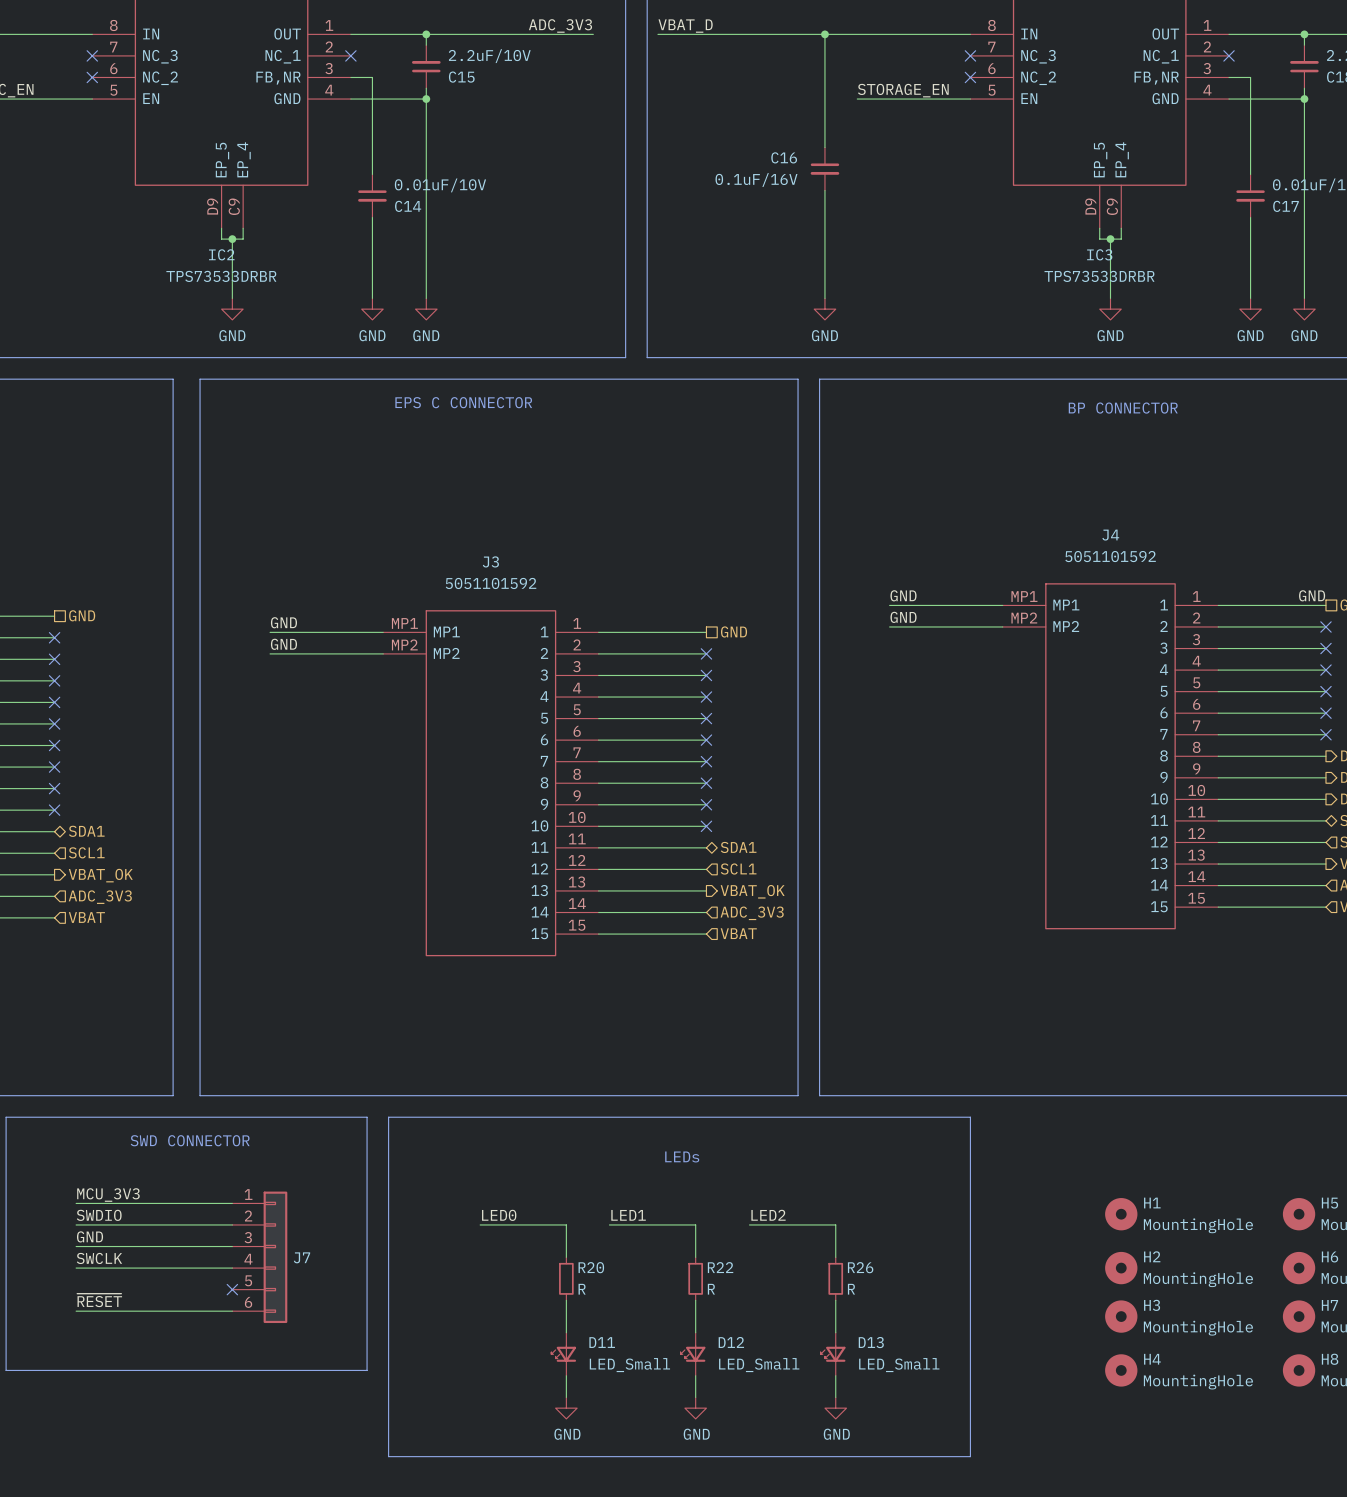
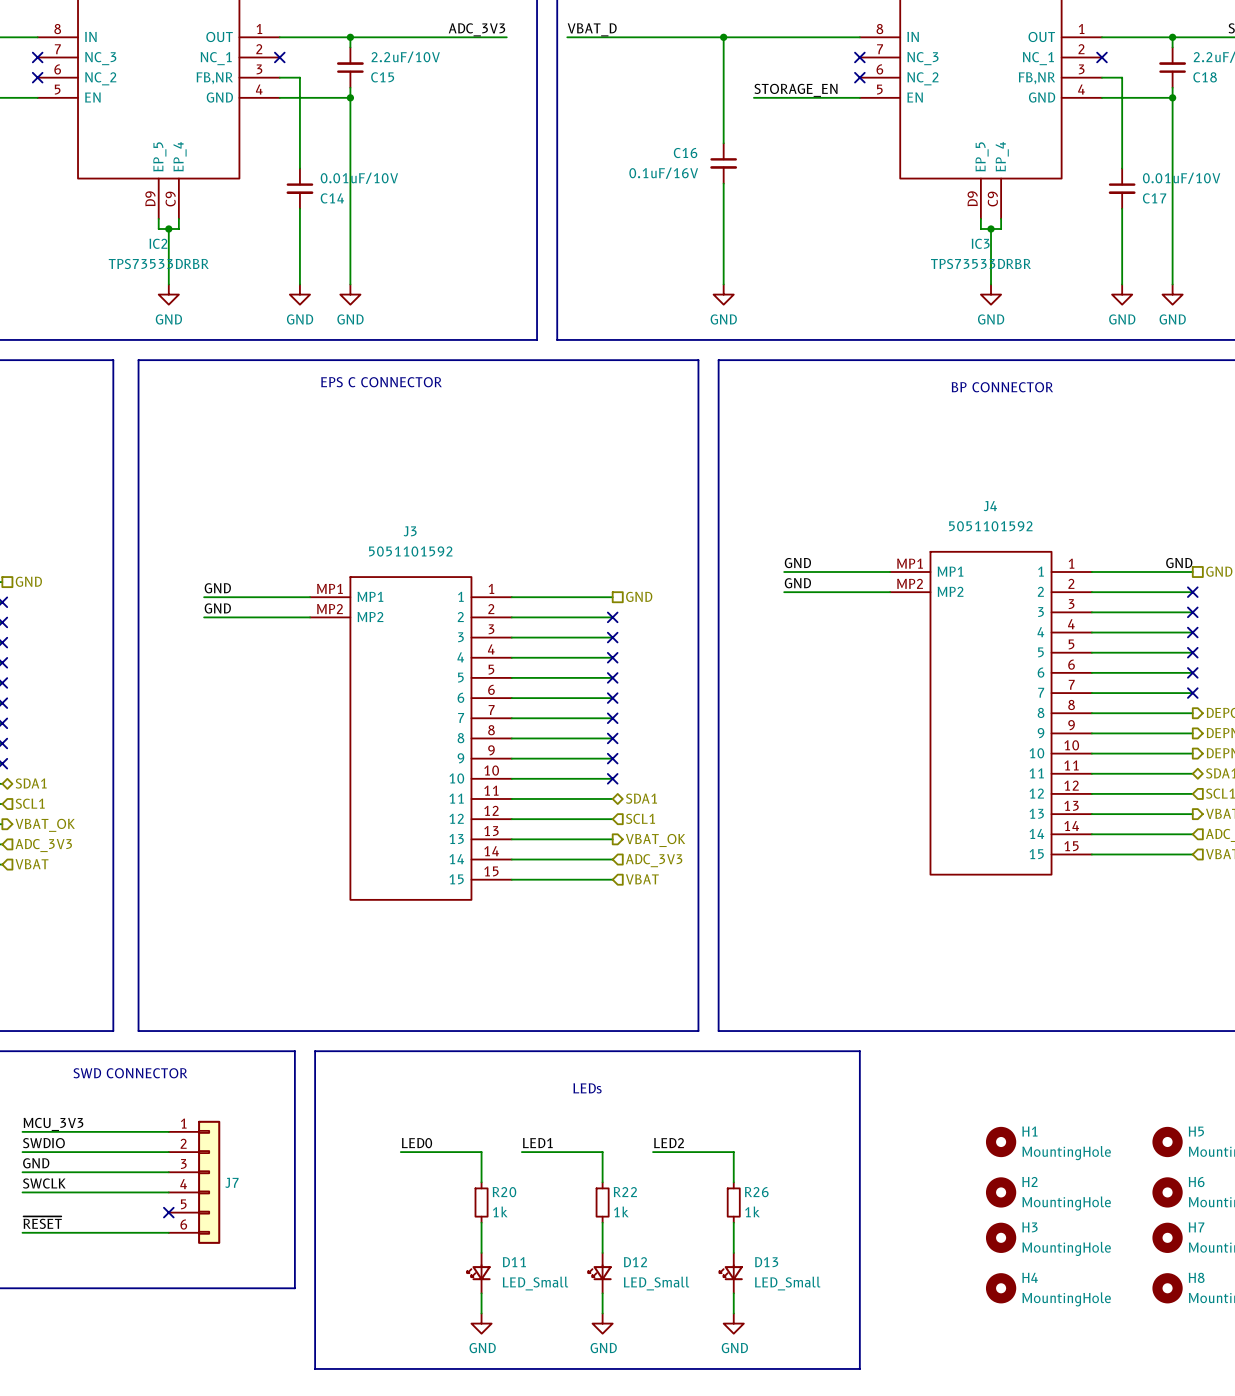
R20 value: R (582, 1289) -> 1k (500, 1211)
R22 value: R (711, 1289) -> 1k (621, 1211)
R26 value: R (851, 1289) -> 1k (752, 1211)

